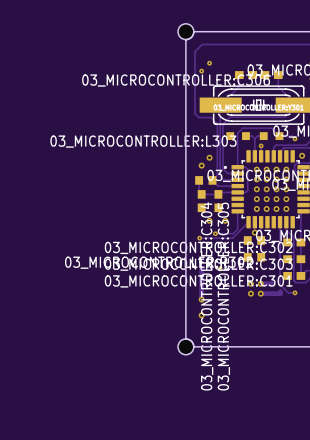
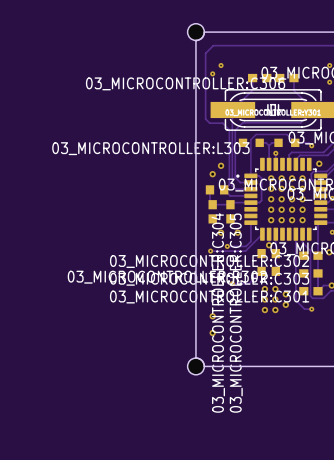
track: (201, 268) (201, 299) -> none
via: none -> (264, 289)
via: none -> (275, 289)
via: none -> (285, 294)
track: (272, 283) (260, 283) -> none
via: none -> (285, 304)
track: (280, 291) (280, 293) (260, 293) -> none

